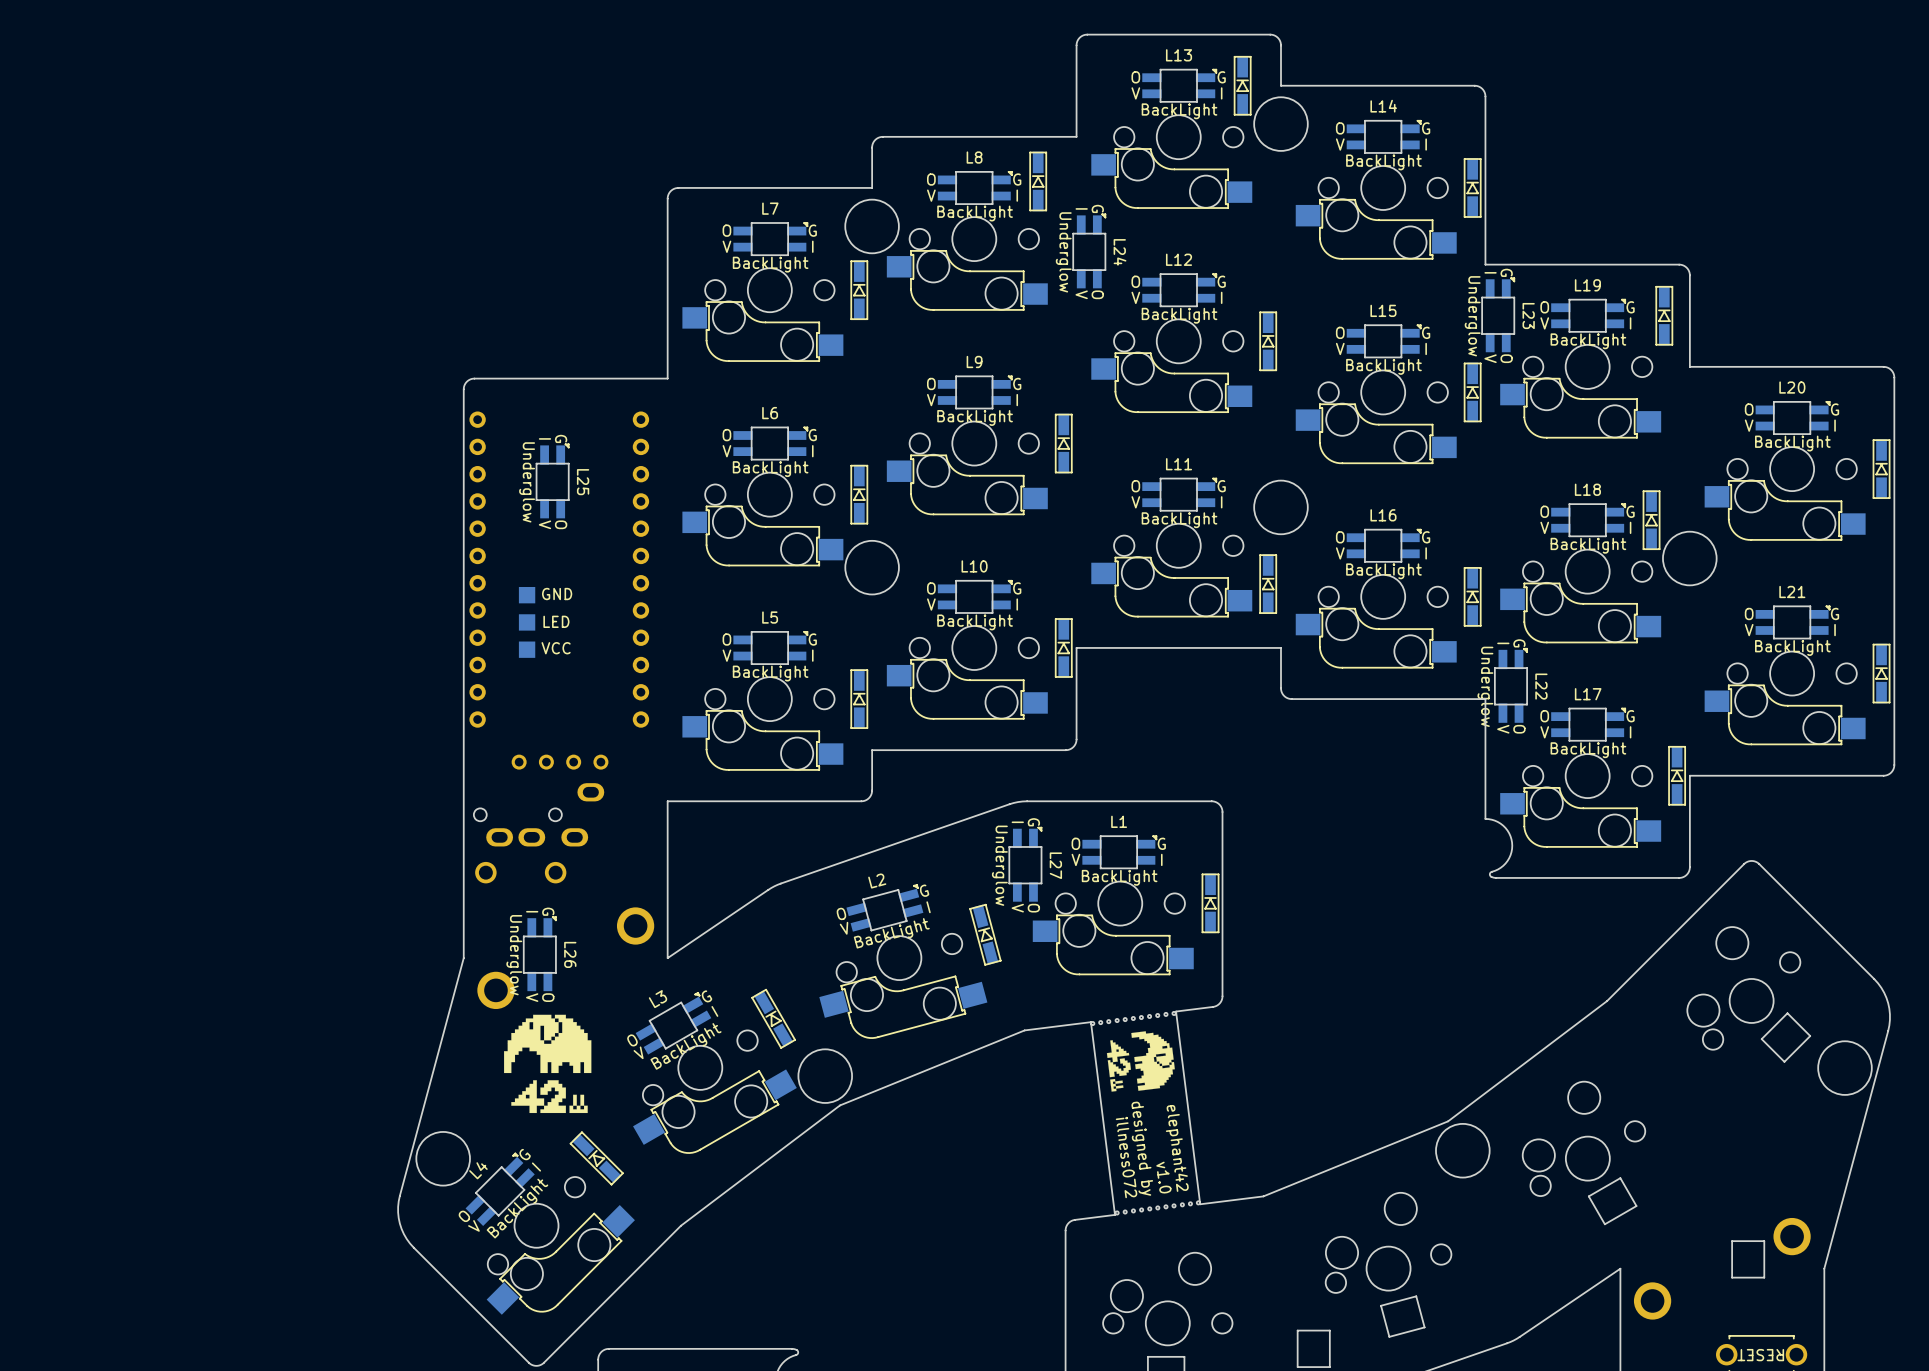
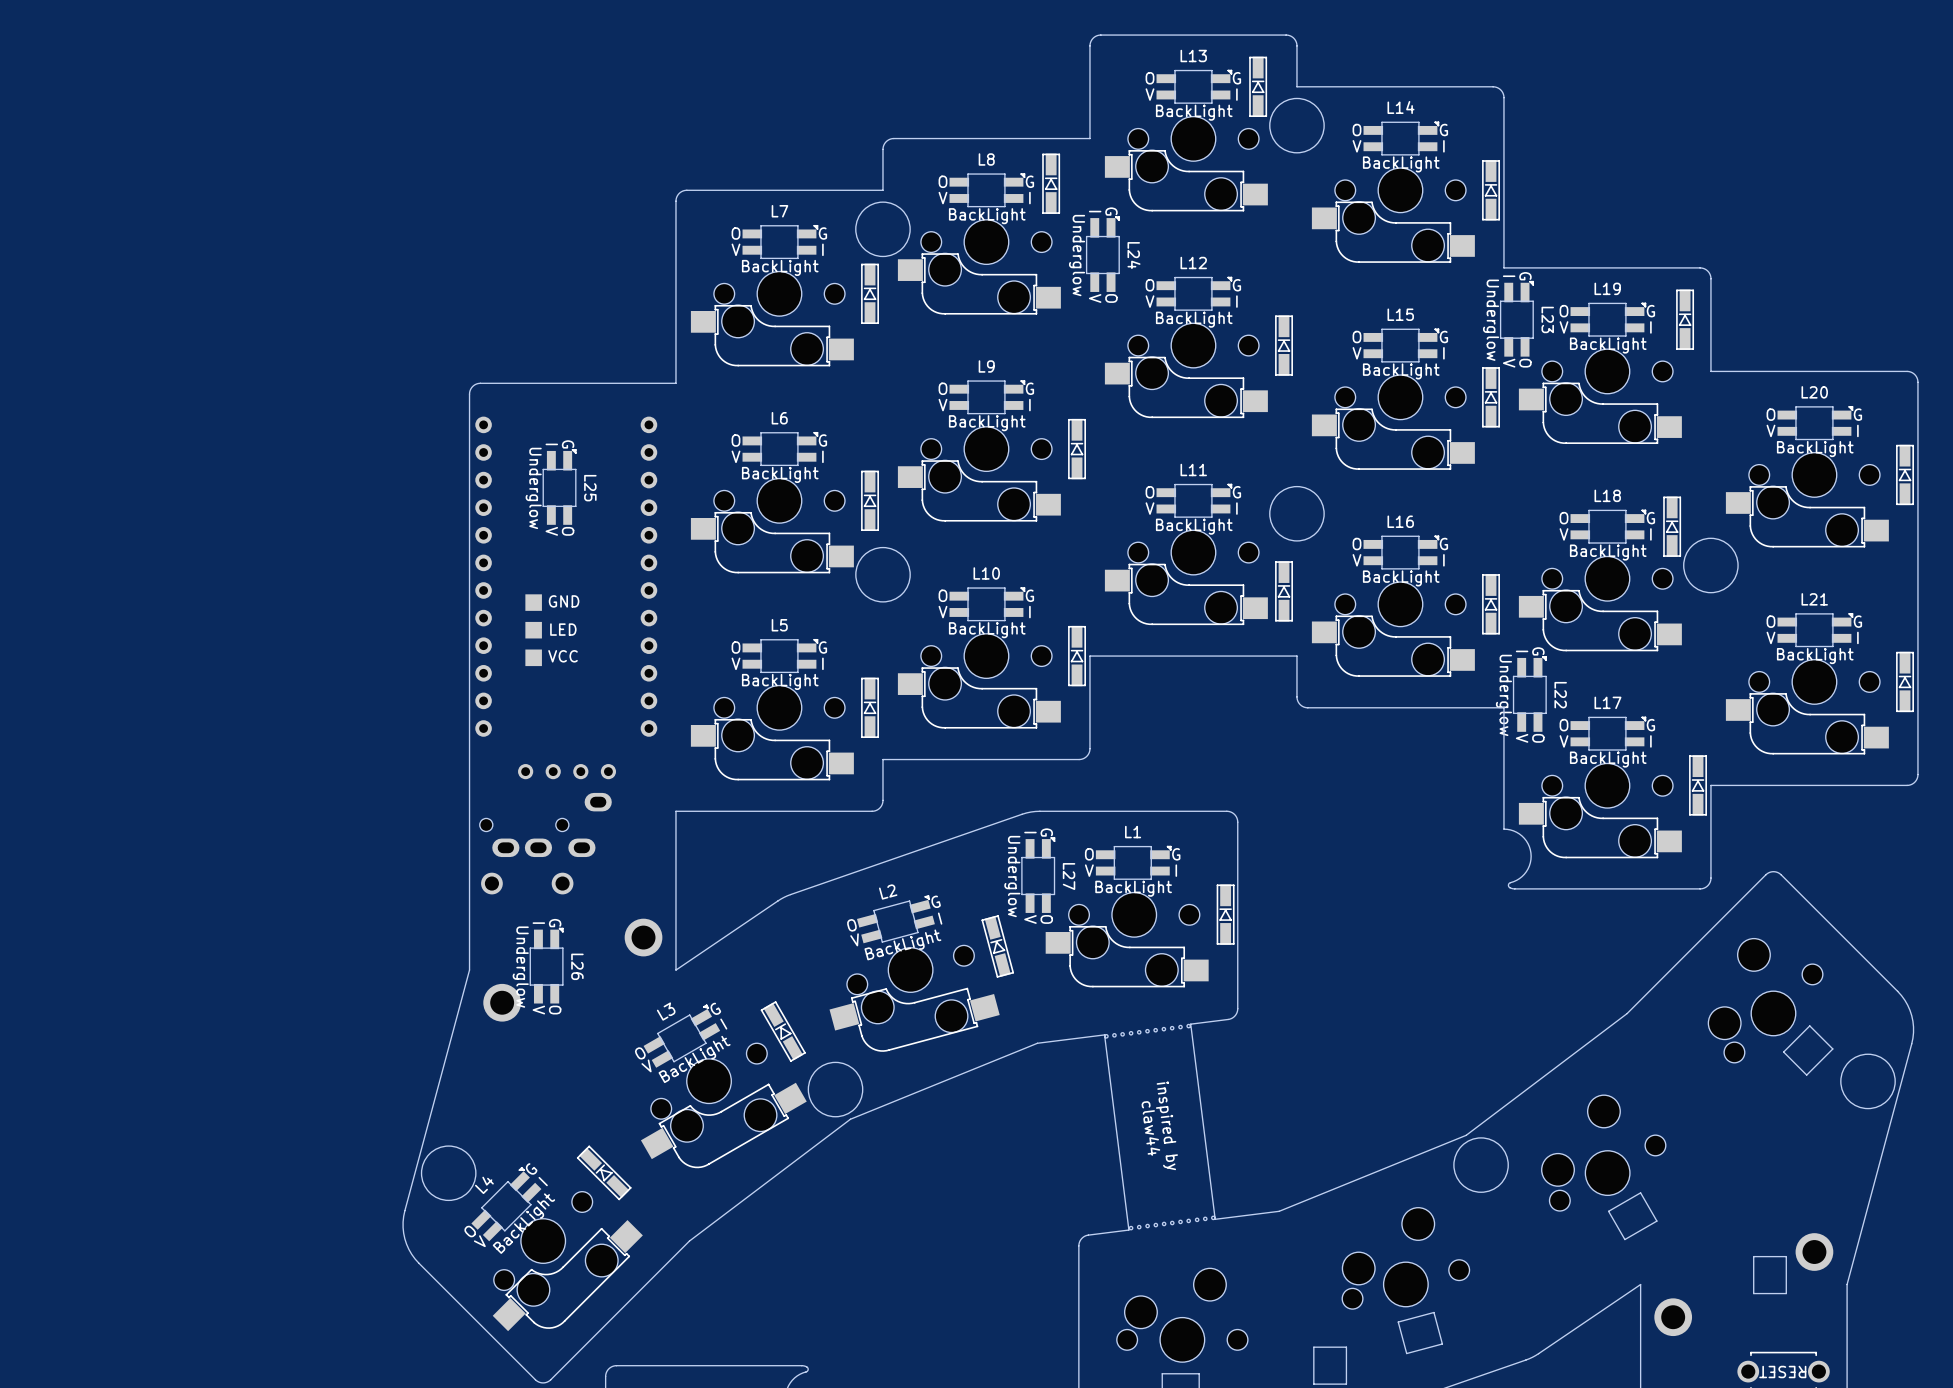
drawing: [504, 1014, 592, 1114] -> none
drawing: [1106, 1031, 1175, 1092] -> none
text: none -> claw44 (1150, 1128)
text: designed by (1142, 1148) -> inspired by (1166, 1125)
text: elephant42 (1177, 1148) -> none
text: illness072 (1126, 1157) -> none
text: v1.0 (1163, 1177) -> none

